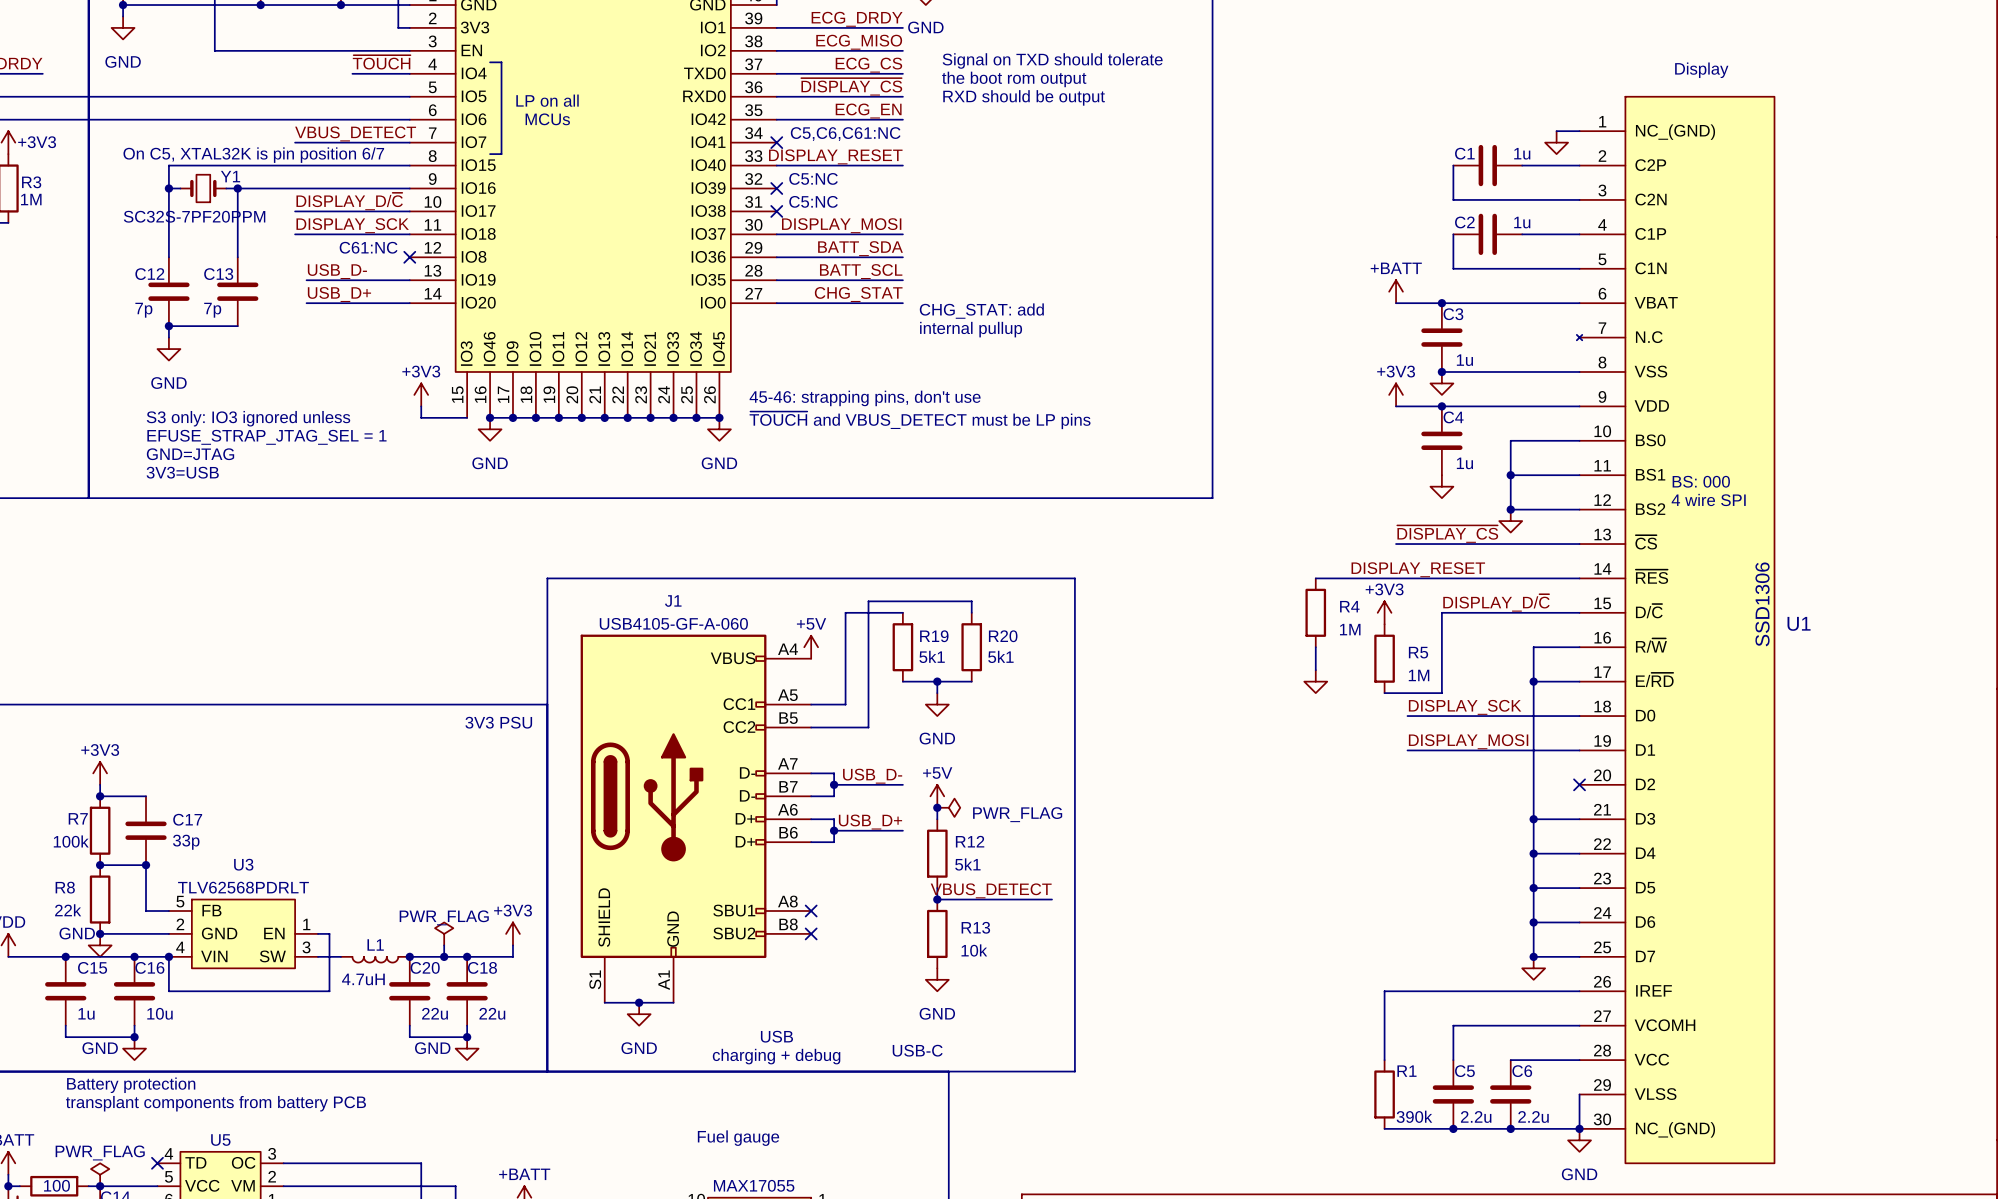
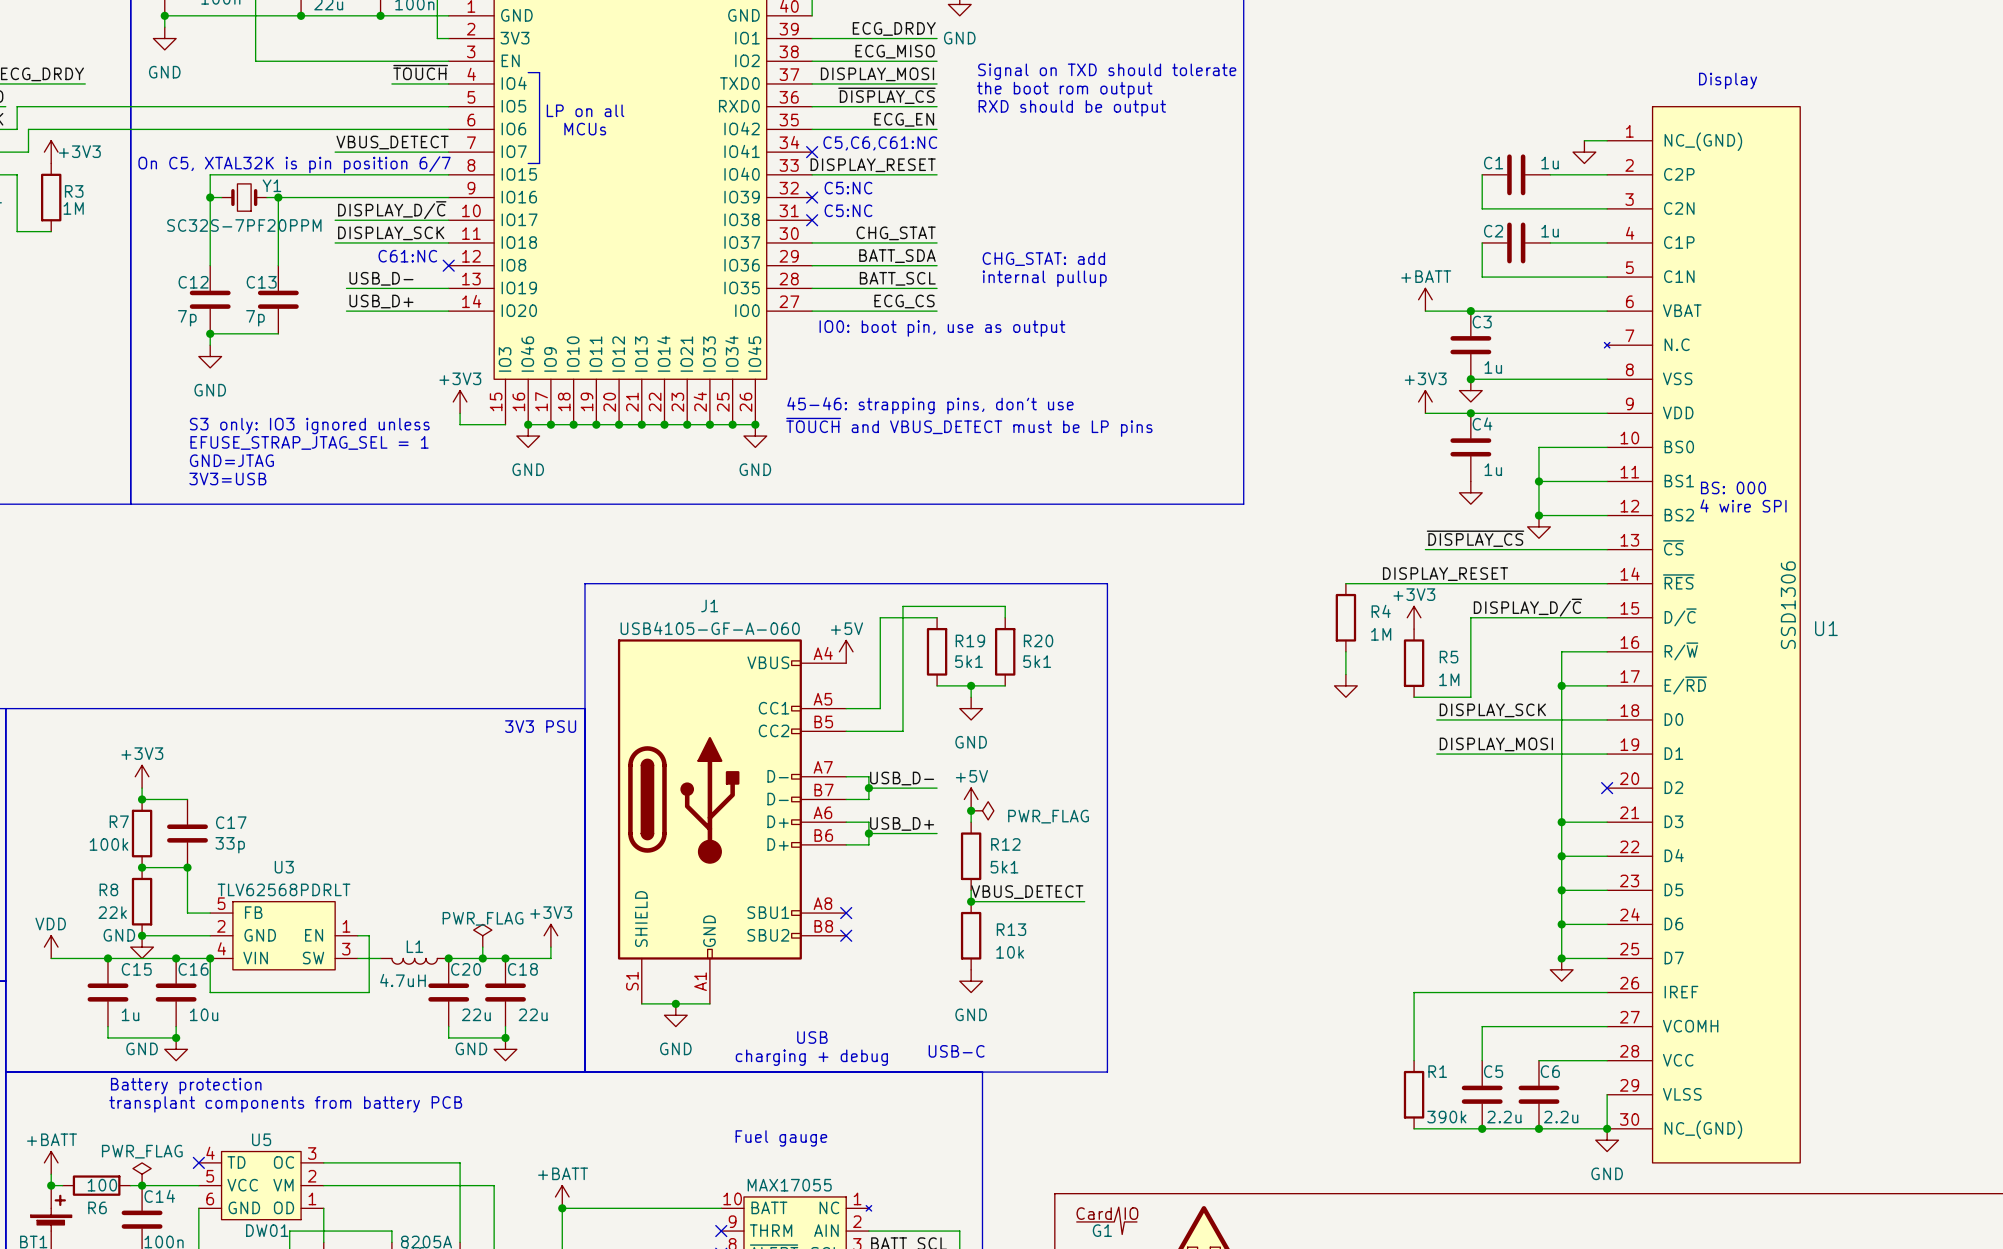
label: ECG_CS (868, 65) -> DISPLAY_MOSI (877, 74)
label: DISPLAY_MOSI (841, 225) -> CHG_STAT (896, 233)
label: CHG_STAT (858, 294) -> ECG_CS (904, 301)
text position: CHG_STAT: add (981, 311) -> CHG_STAT: add (1043, 259)
text: none -> IO0: boot pin, use as output (942, 328)
text position: internal pullup (971, 329) -> internal pullup (1044, 278)

